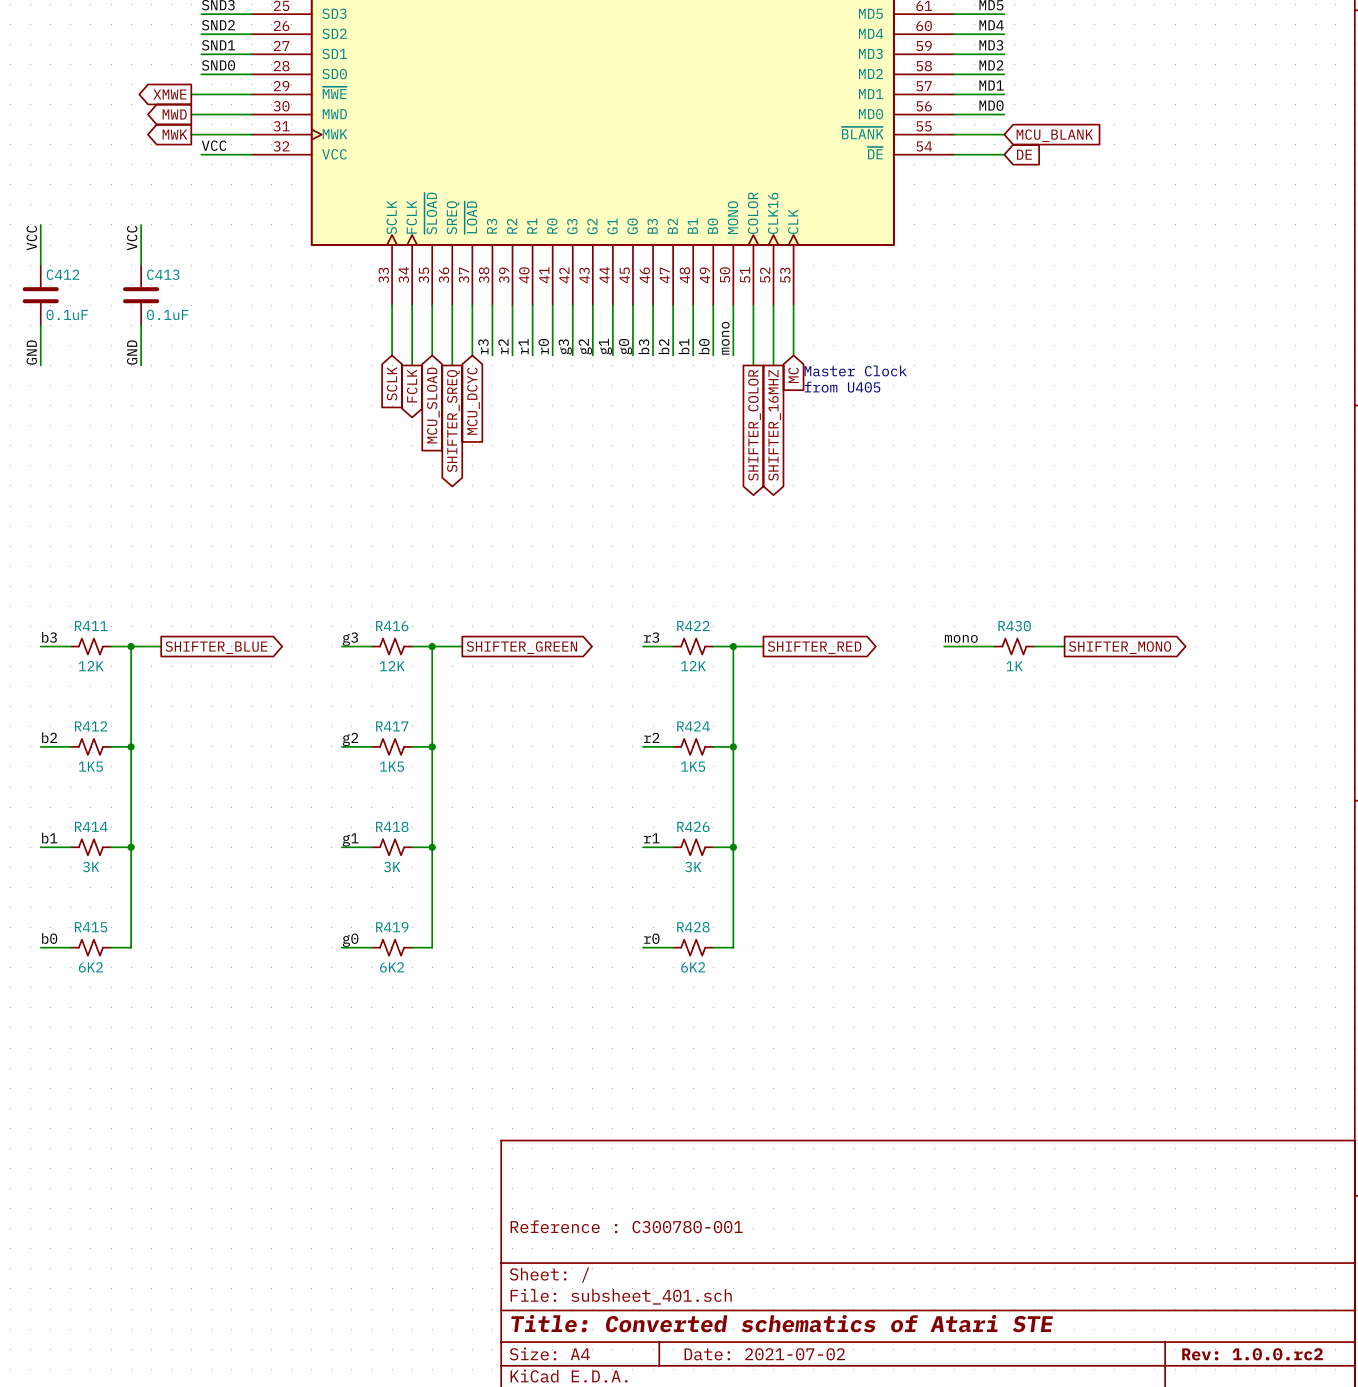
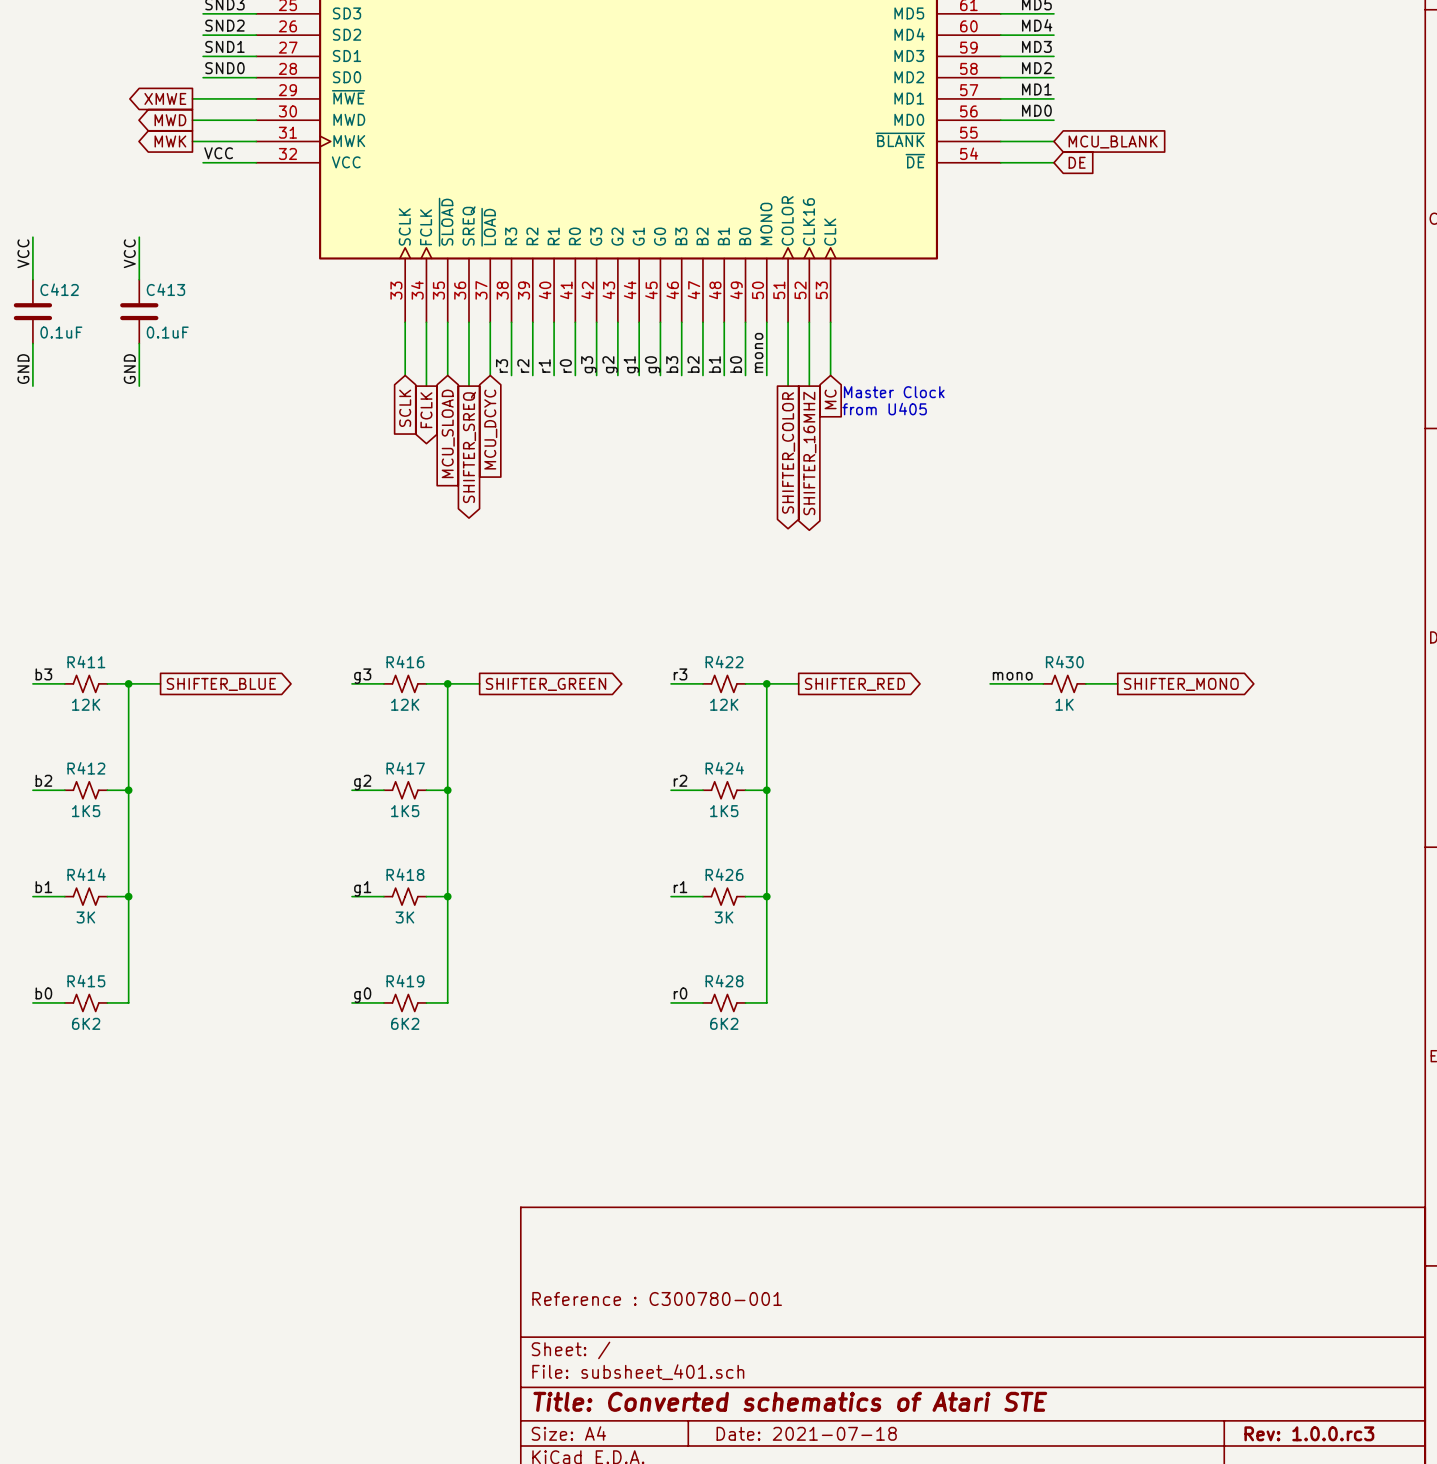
title block: Date: 2021-07-02 (764, 1354) -> Date: 2021-07-18 (806, 1433)
title block: Rev: 1.0.0.rc2 (1252, 1354) -> Rev: 1.0.0.rc3 (1309, 1433)

